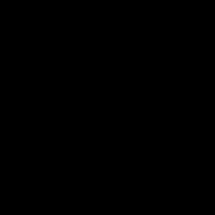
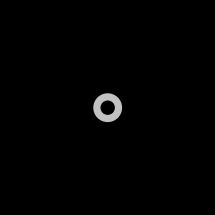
via: none -> (107, 107)

